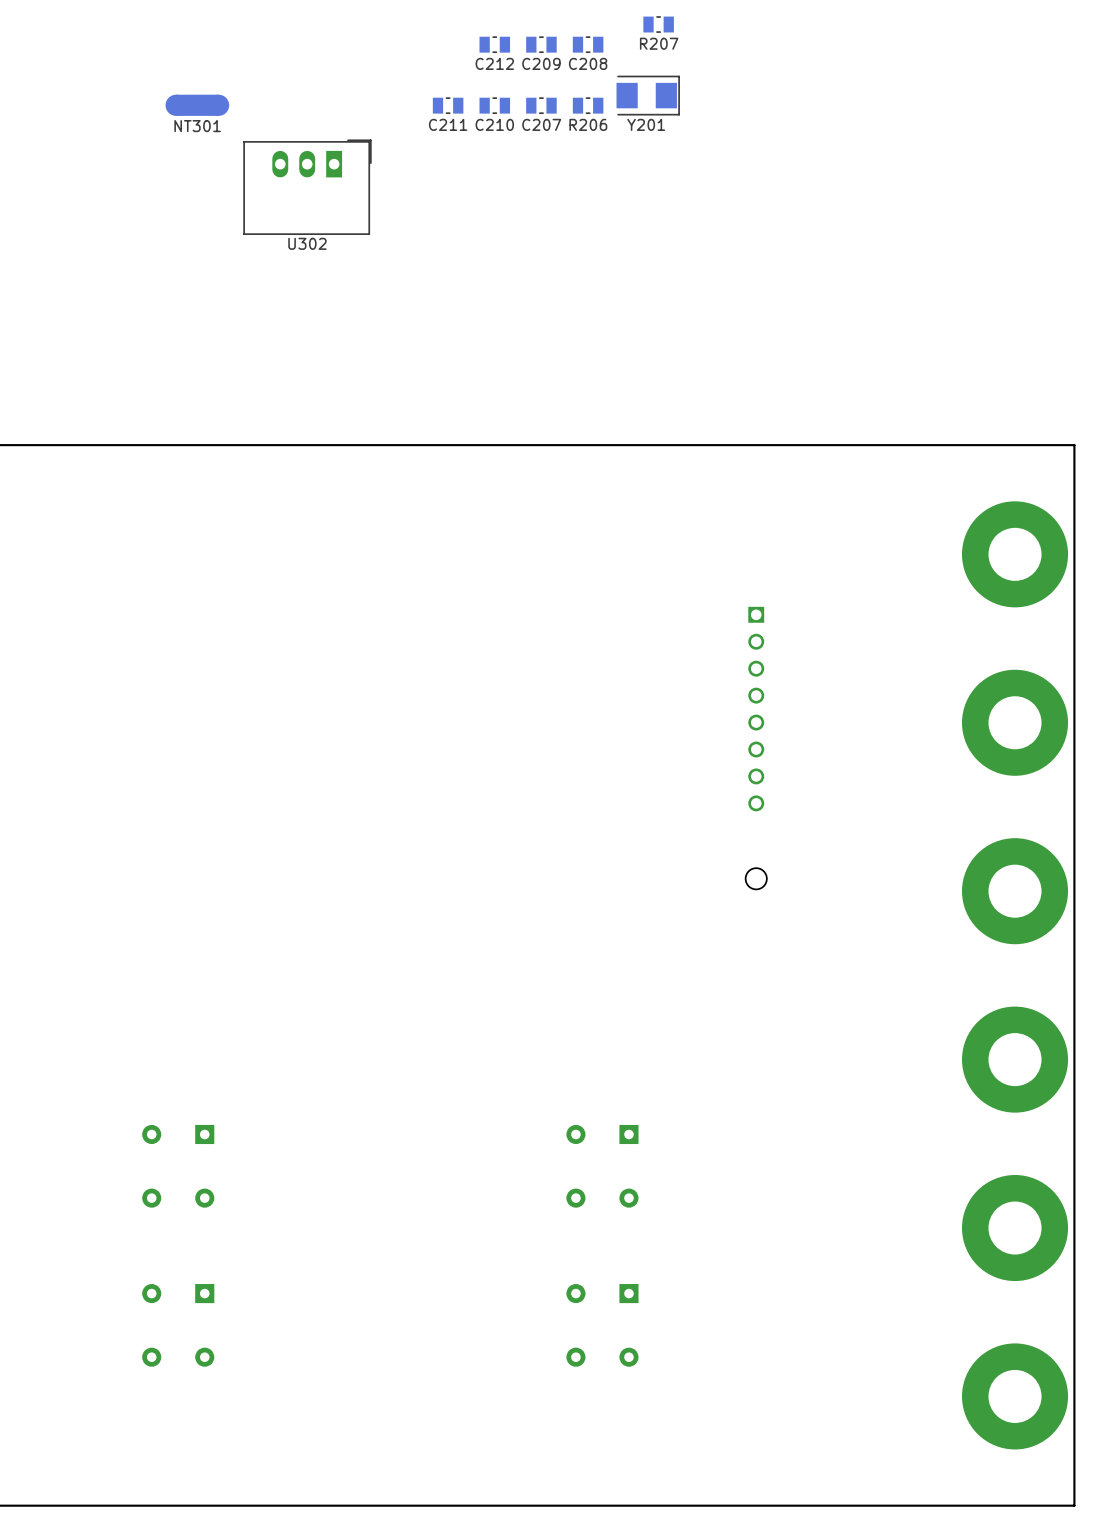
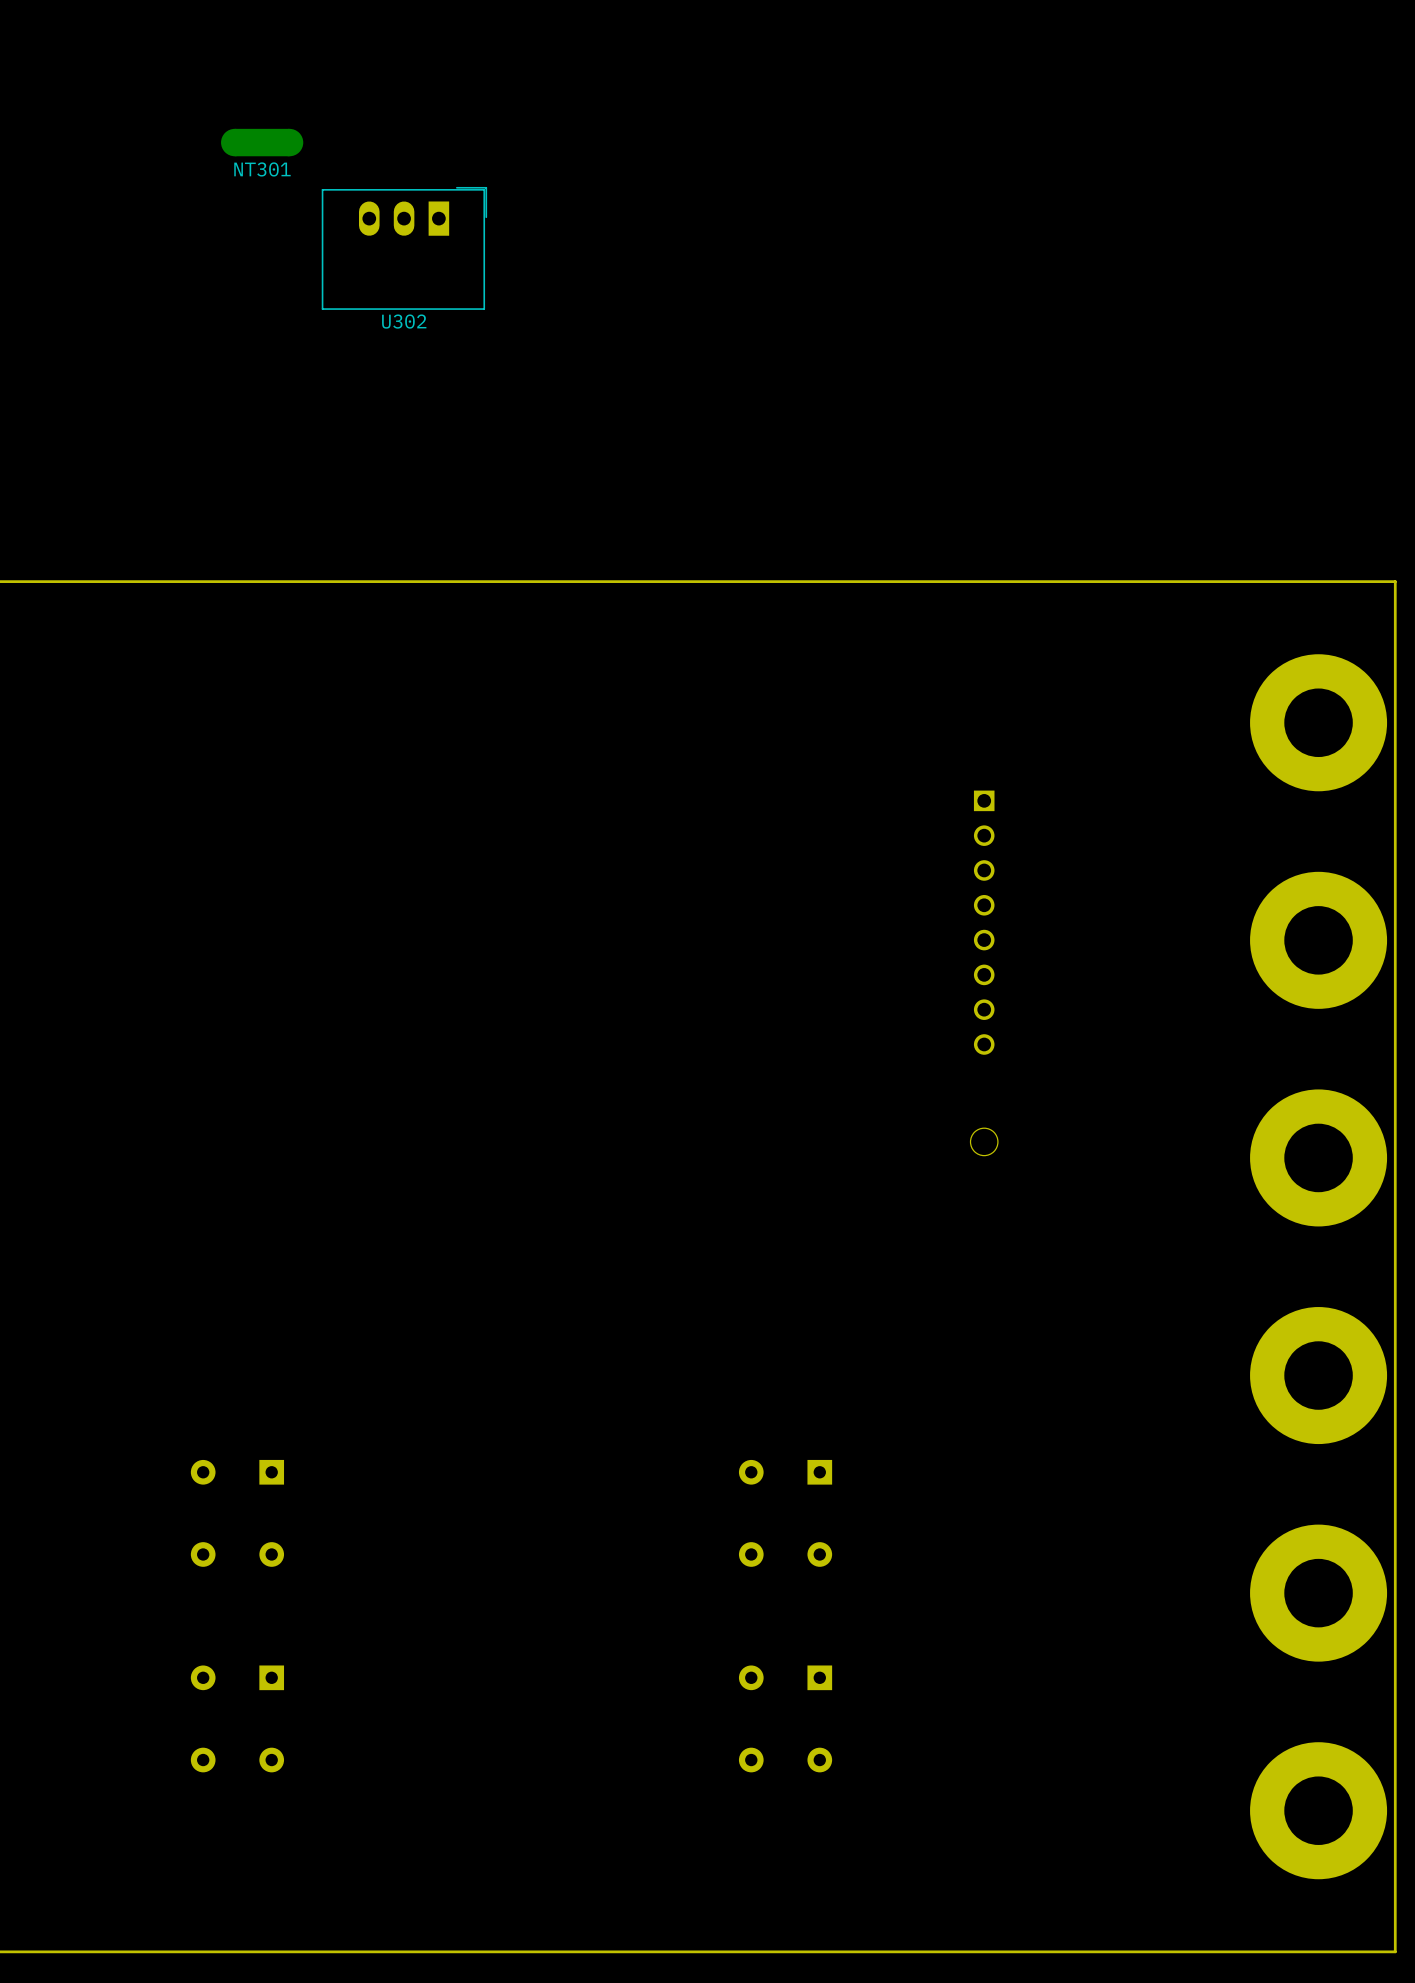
R207: (658, 24) -> none
C212: (494, 44) -> none
C209: (541, 44) -> none
C208: (588, 44) -> none
Y201: (648, 95) -> none
C211: (448, 105) -> none
C210: (494, 105) -> none
C207: (541, 105) -> none
R206: (588, 105) -> none

